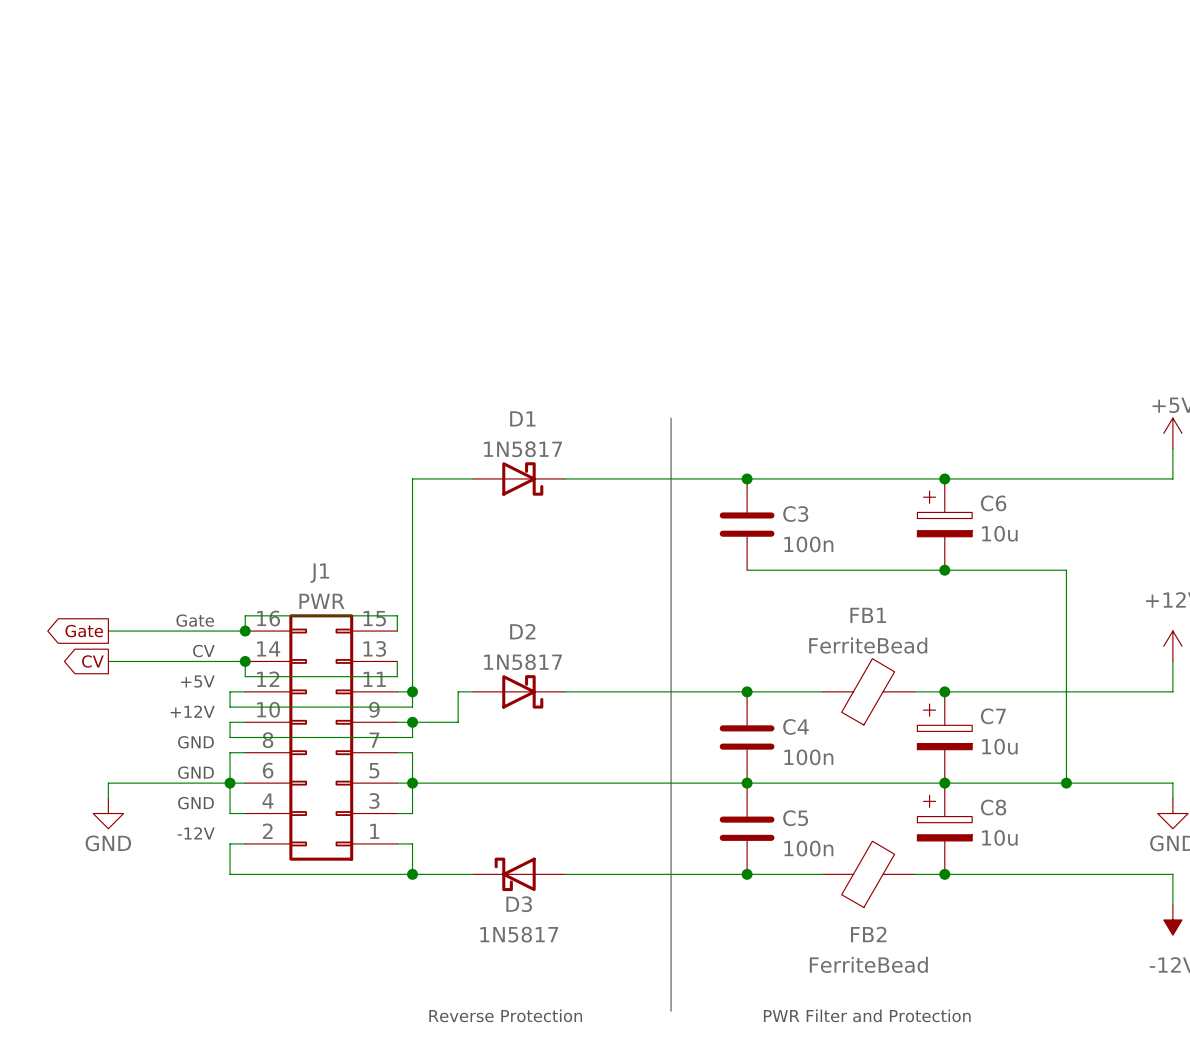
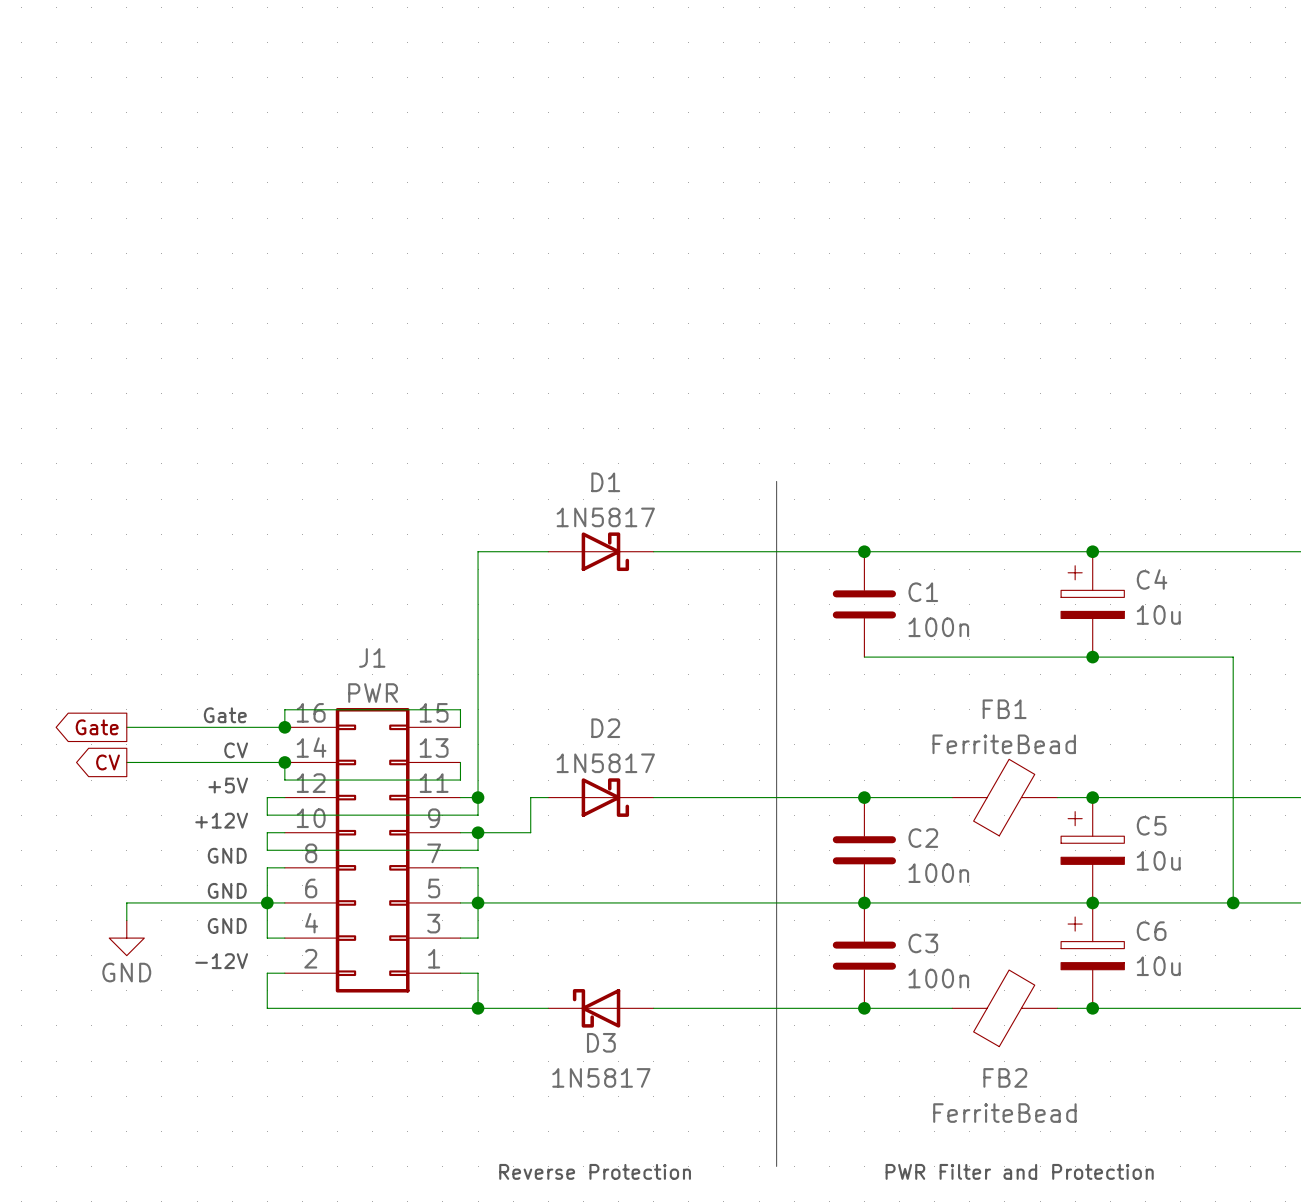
C6 name: C6 (993, 503) -> C4 (1152, 579)
C3 name: C3 (795, 514) -> C1 (923, 592)
C7 name: C7 (993, 716) -> C5 (1151, 825)
C4 name: C4 (795, 726) -> C2 (923, 838)
C8 name: C8 (993, 807) -> C6 (1151, 931)
C5 name: C5 (795, 818) -> C3 (923, 943)

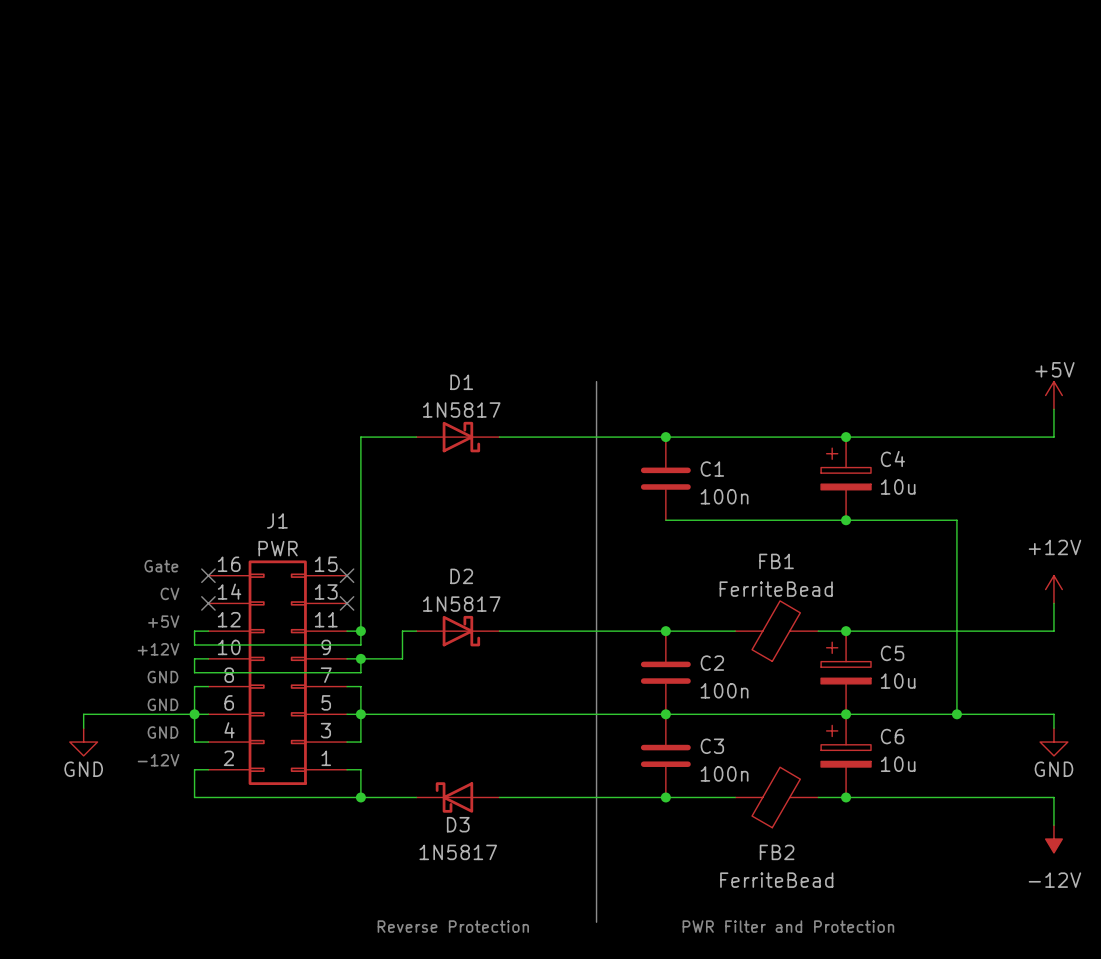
global label: Gate (97, 727) -> none
wire: (126, 727) (284, 727) (284, 709) (460, 709) (460, 727) -> none
junction: (284, 727) -> none
no-connect mark: none -> (208, 575)
no-connect mark: none -> (347, 575)
global label: CV (108, 762) -> none
wire: (126, 762) (284, 762) (284, 780) (460, 780) (460, 762) -> none
junction: (284, 762) -> none
no-connect mark: none -> (208, 603)
no-connect mark: none -> (347, 603)

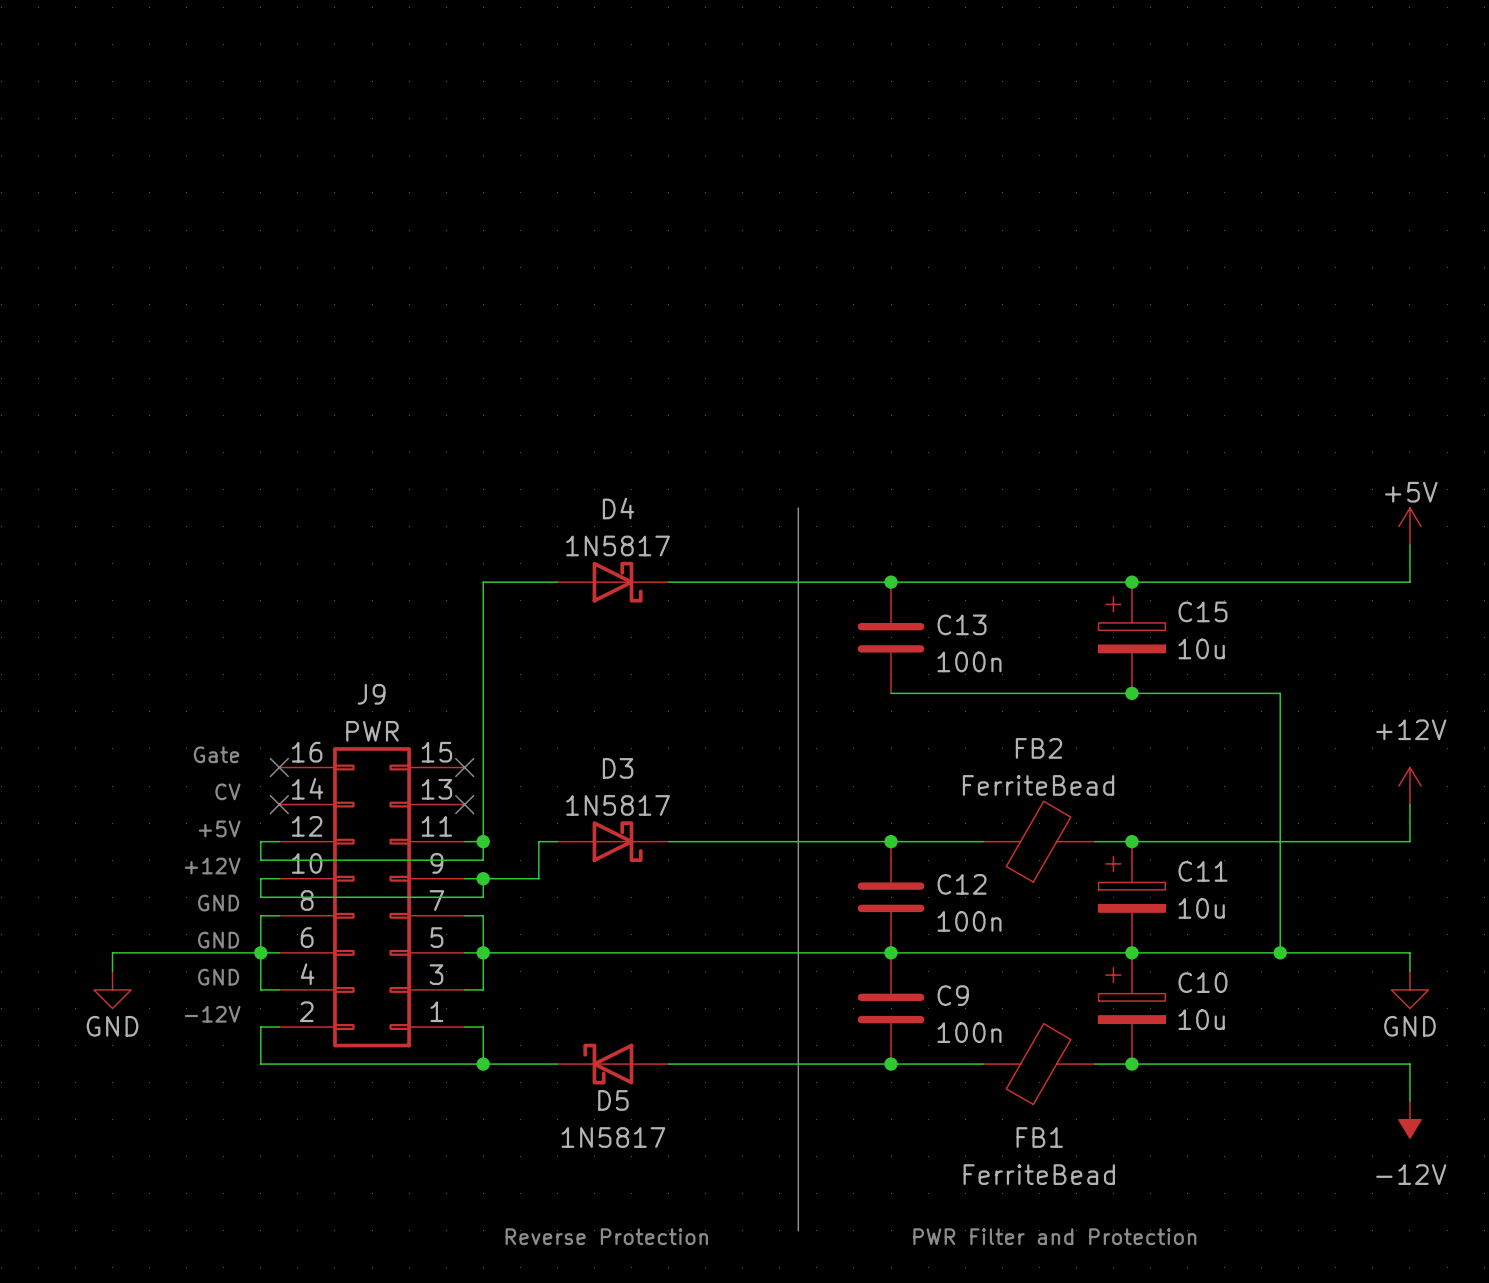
D1 name: D1 (461, 382) -> D4 (618, 508)
C4 name: C4 (892, 459) -> C15 (1202, 611)
C1 name: C1 (712, 469) -> C13 (962, 624)
J1 name: J1 (277, 520) -> J9 (371, 694)
FB1 name: FB1 (776, 561) -> FB2 (1038, 748)
D2 name: D2 (461, 576) -> D3 (618, 768)
C5 name: C5 (892, 653) -> C11 (1202, 871)
C2 name: C2 (712, 663) -> C12 (962, 884)
C6 name: C6 (892, 736) -> C10 (1202, 982)
C3 name: C3 (712, 746) -> C9 (953, 995)
D3 name: D3 (458, 824) -> D5 (613, 1100)
FB2 name: FB2 (777, 852) -> FB1 (1039, 1137)

